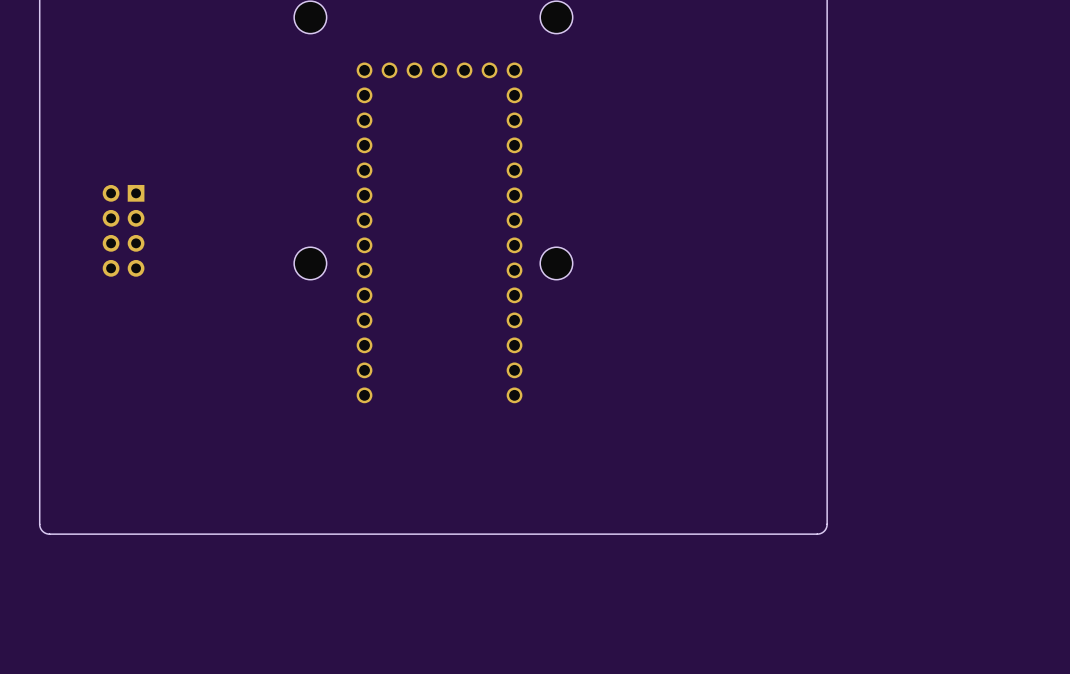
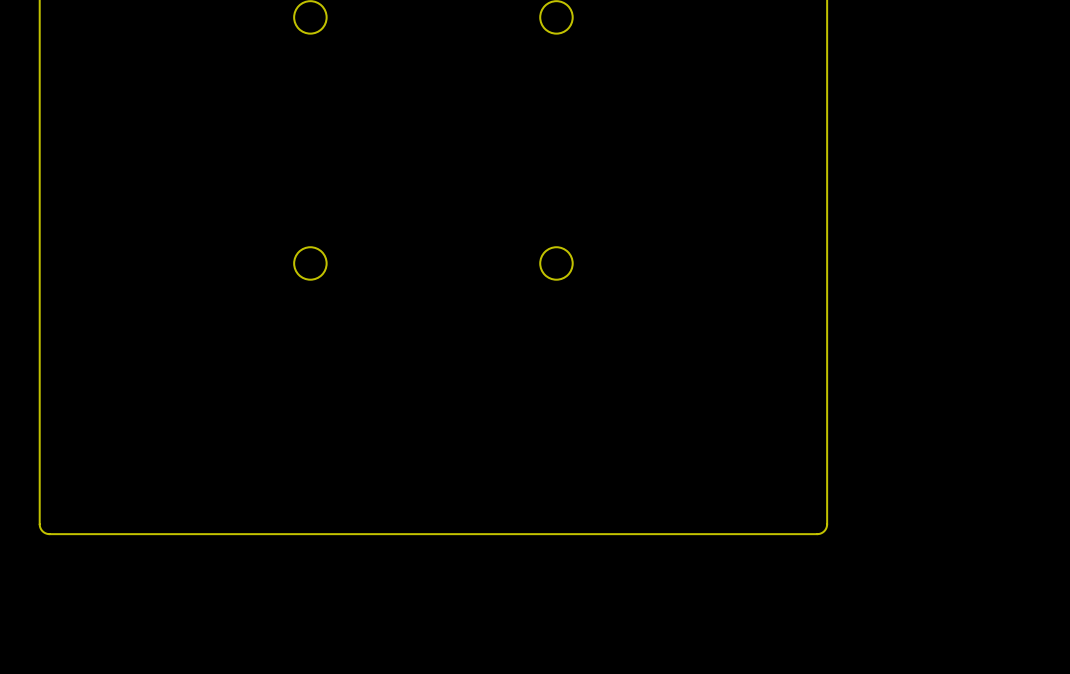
part: (123, 230) -> none
part: (439, 232) -> none

